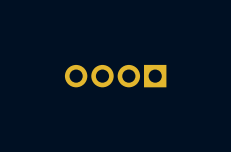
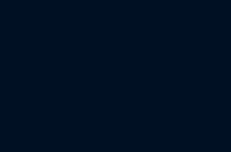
part: (115, 76) -> none

